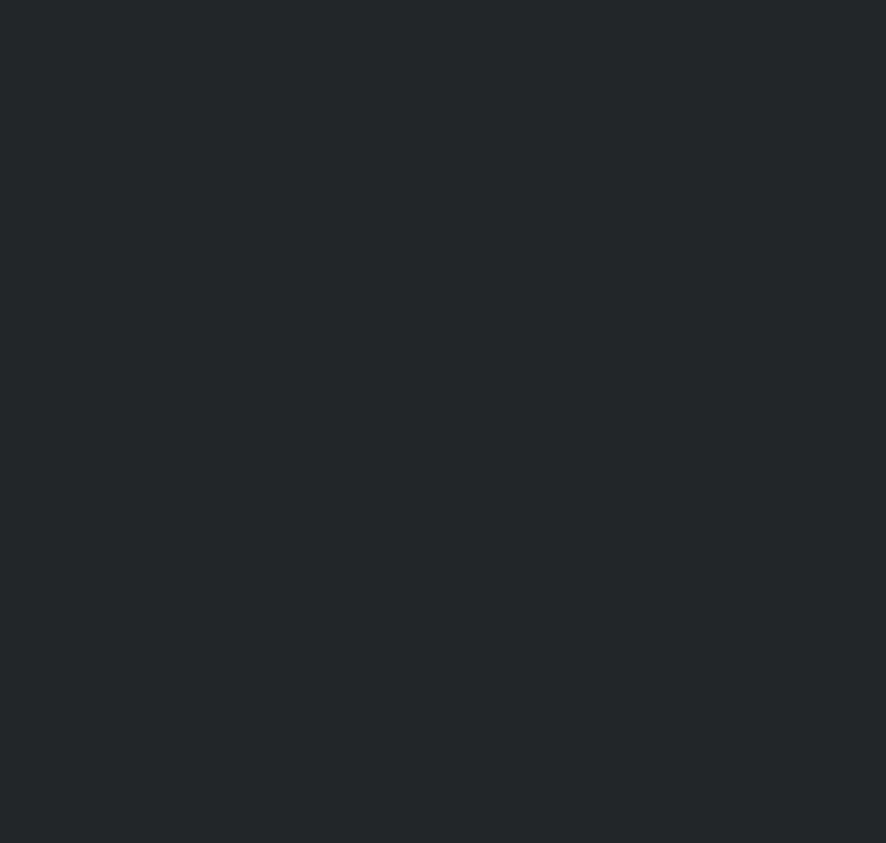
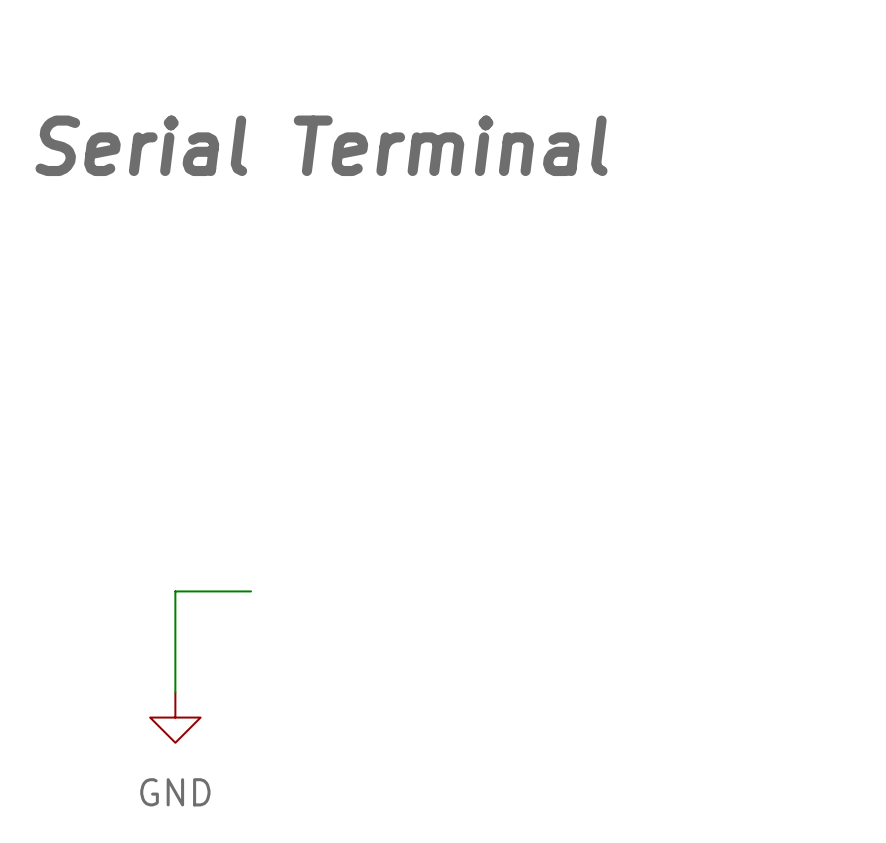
label: none -> Serial Terminal (321, 145)
wire: none -> (251, 591) (175, 591) (175, 692)
power symbol: none -> GND (175, 717)

